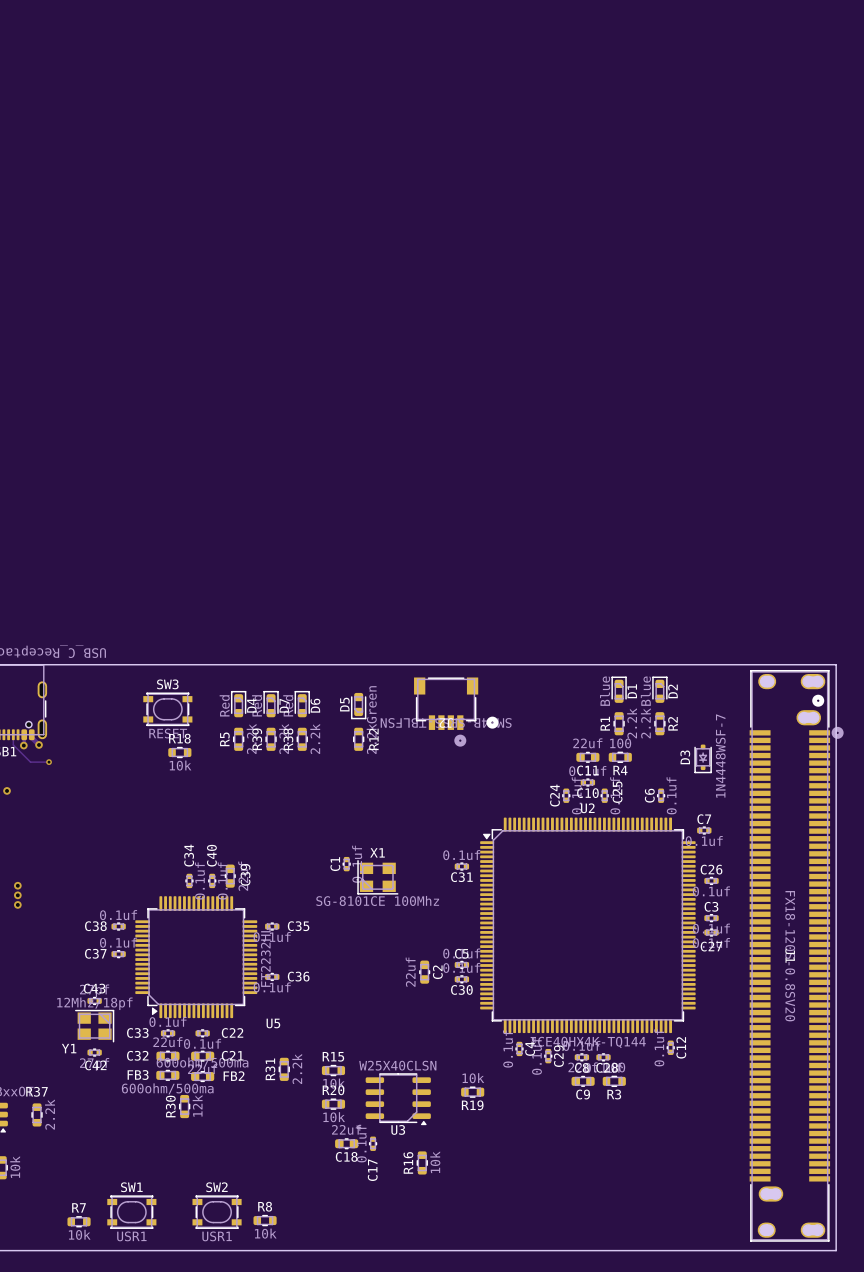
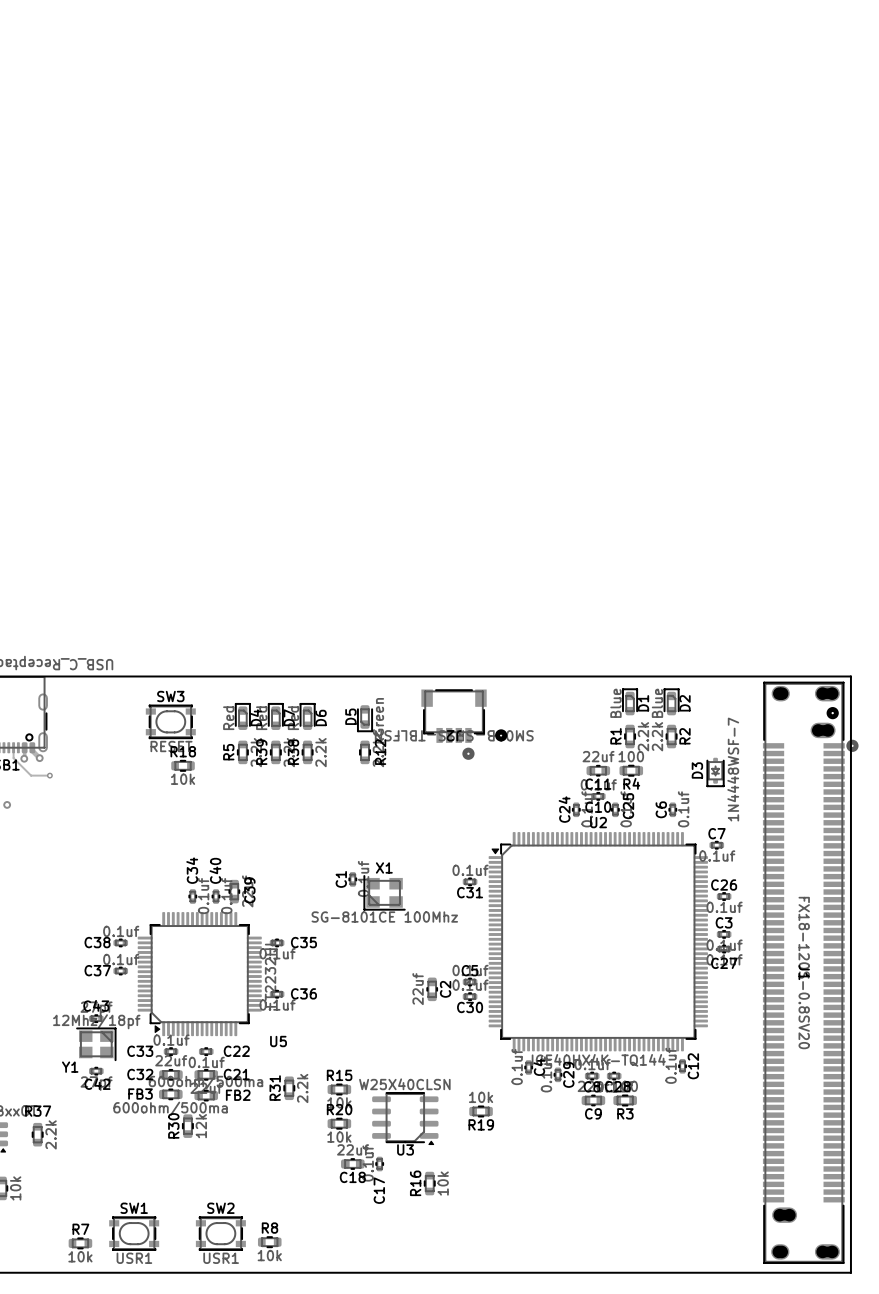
via: (17, 885) -> none
via: (17, 895) -> none
via: (17, 904) -> none

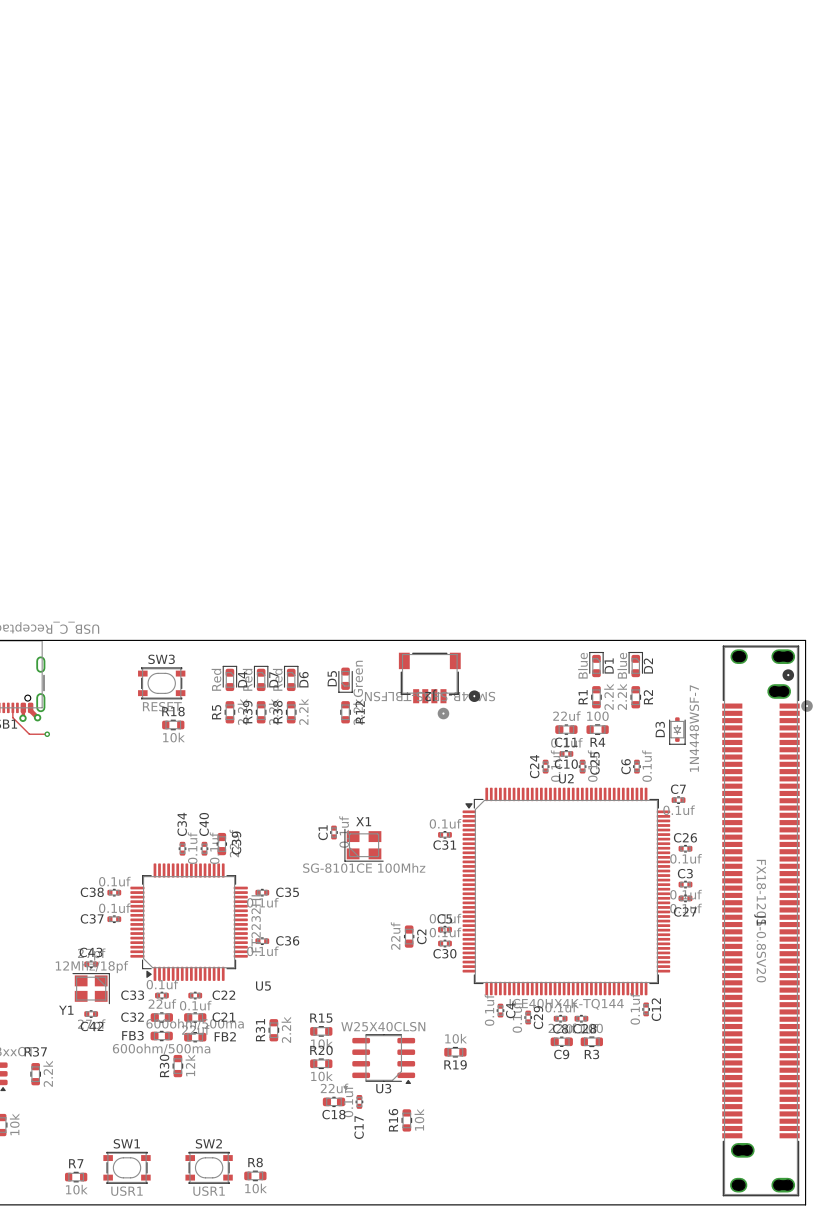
via: (7, 804) -> none

